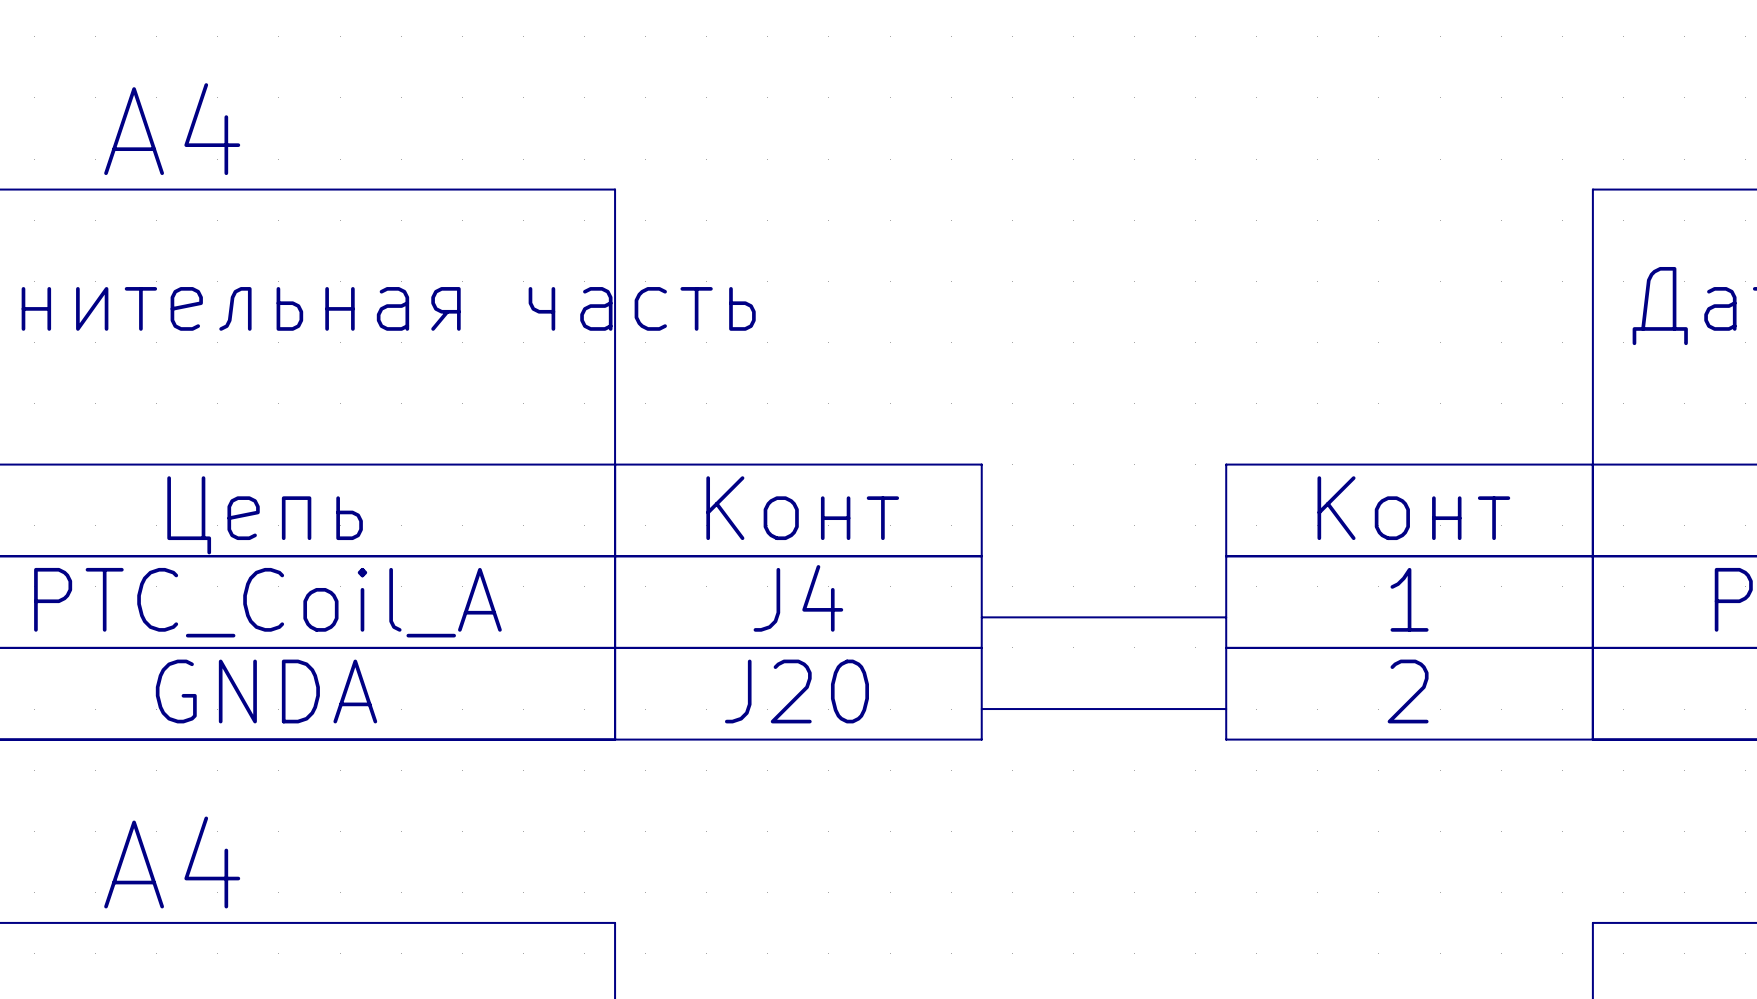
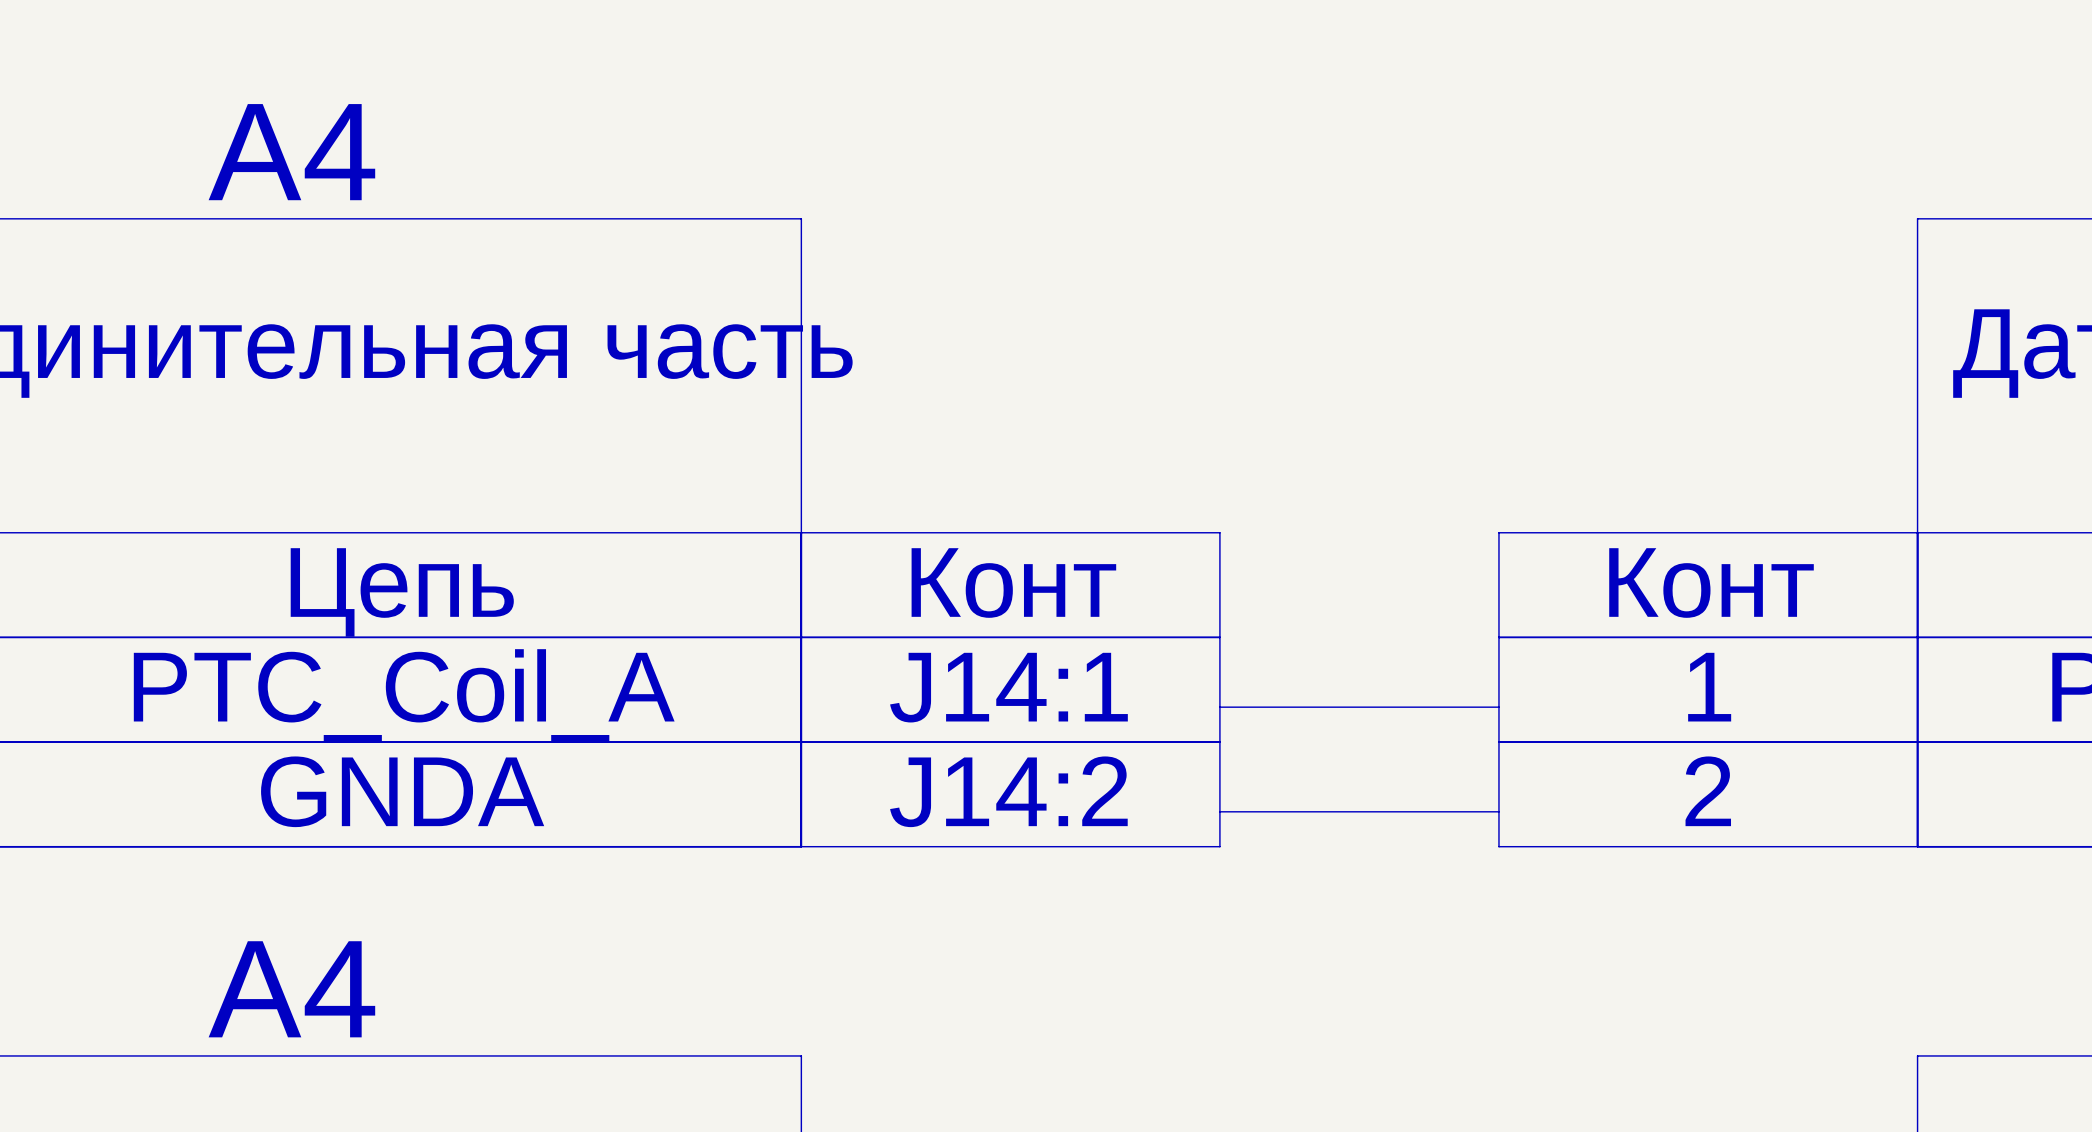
text: J4 (798, 598) -> J14:1 (1008, 687)
text: J20 (796, 691) -> J14:2 (1008, 791)

